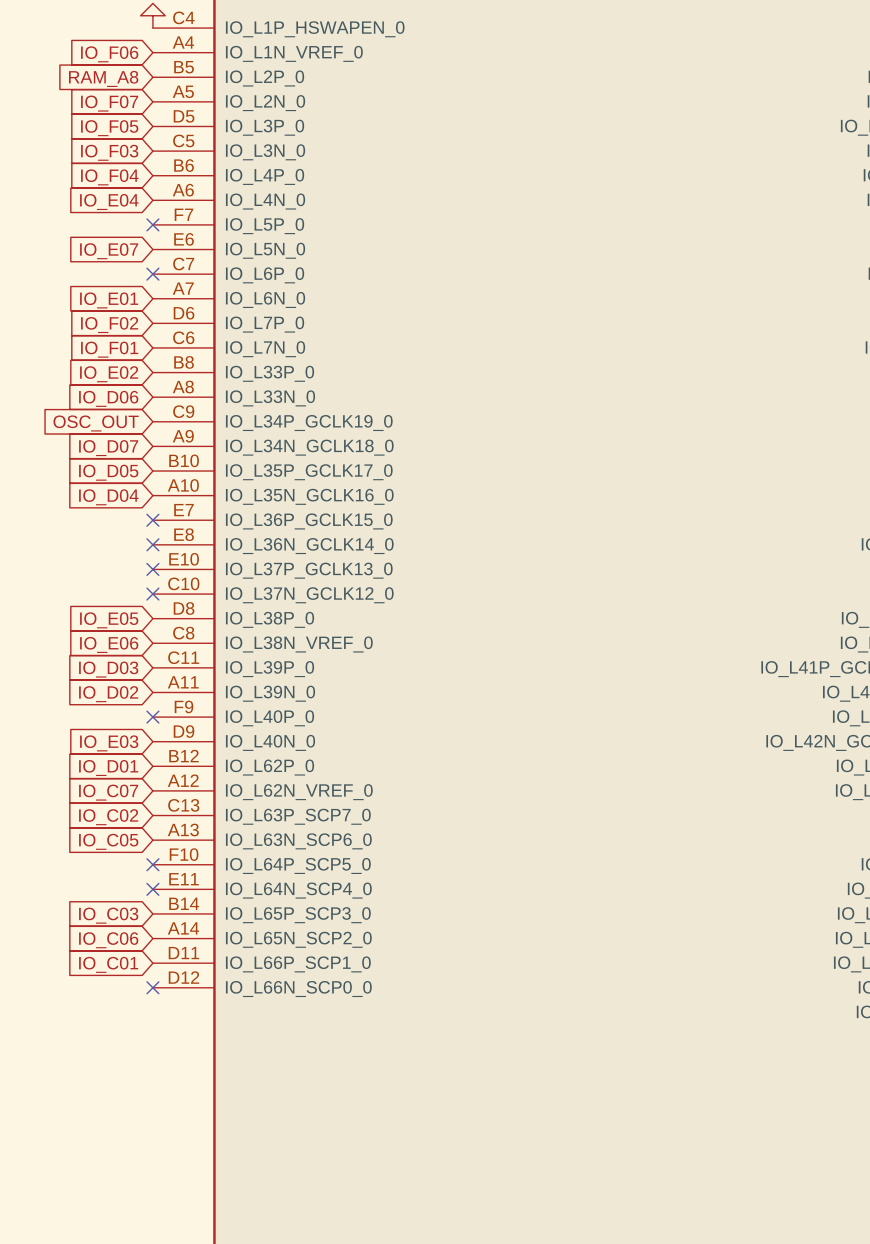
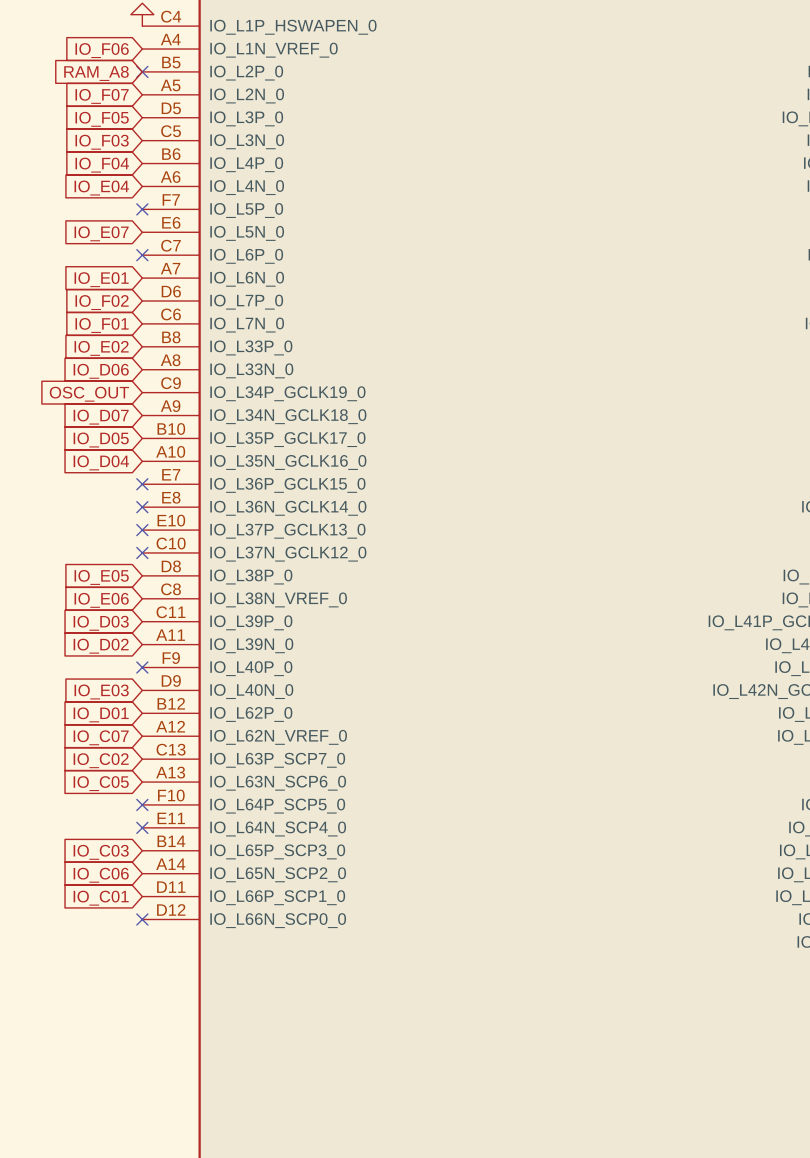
no-connect mark: none -> (142, 71)

